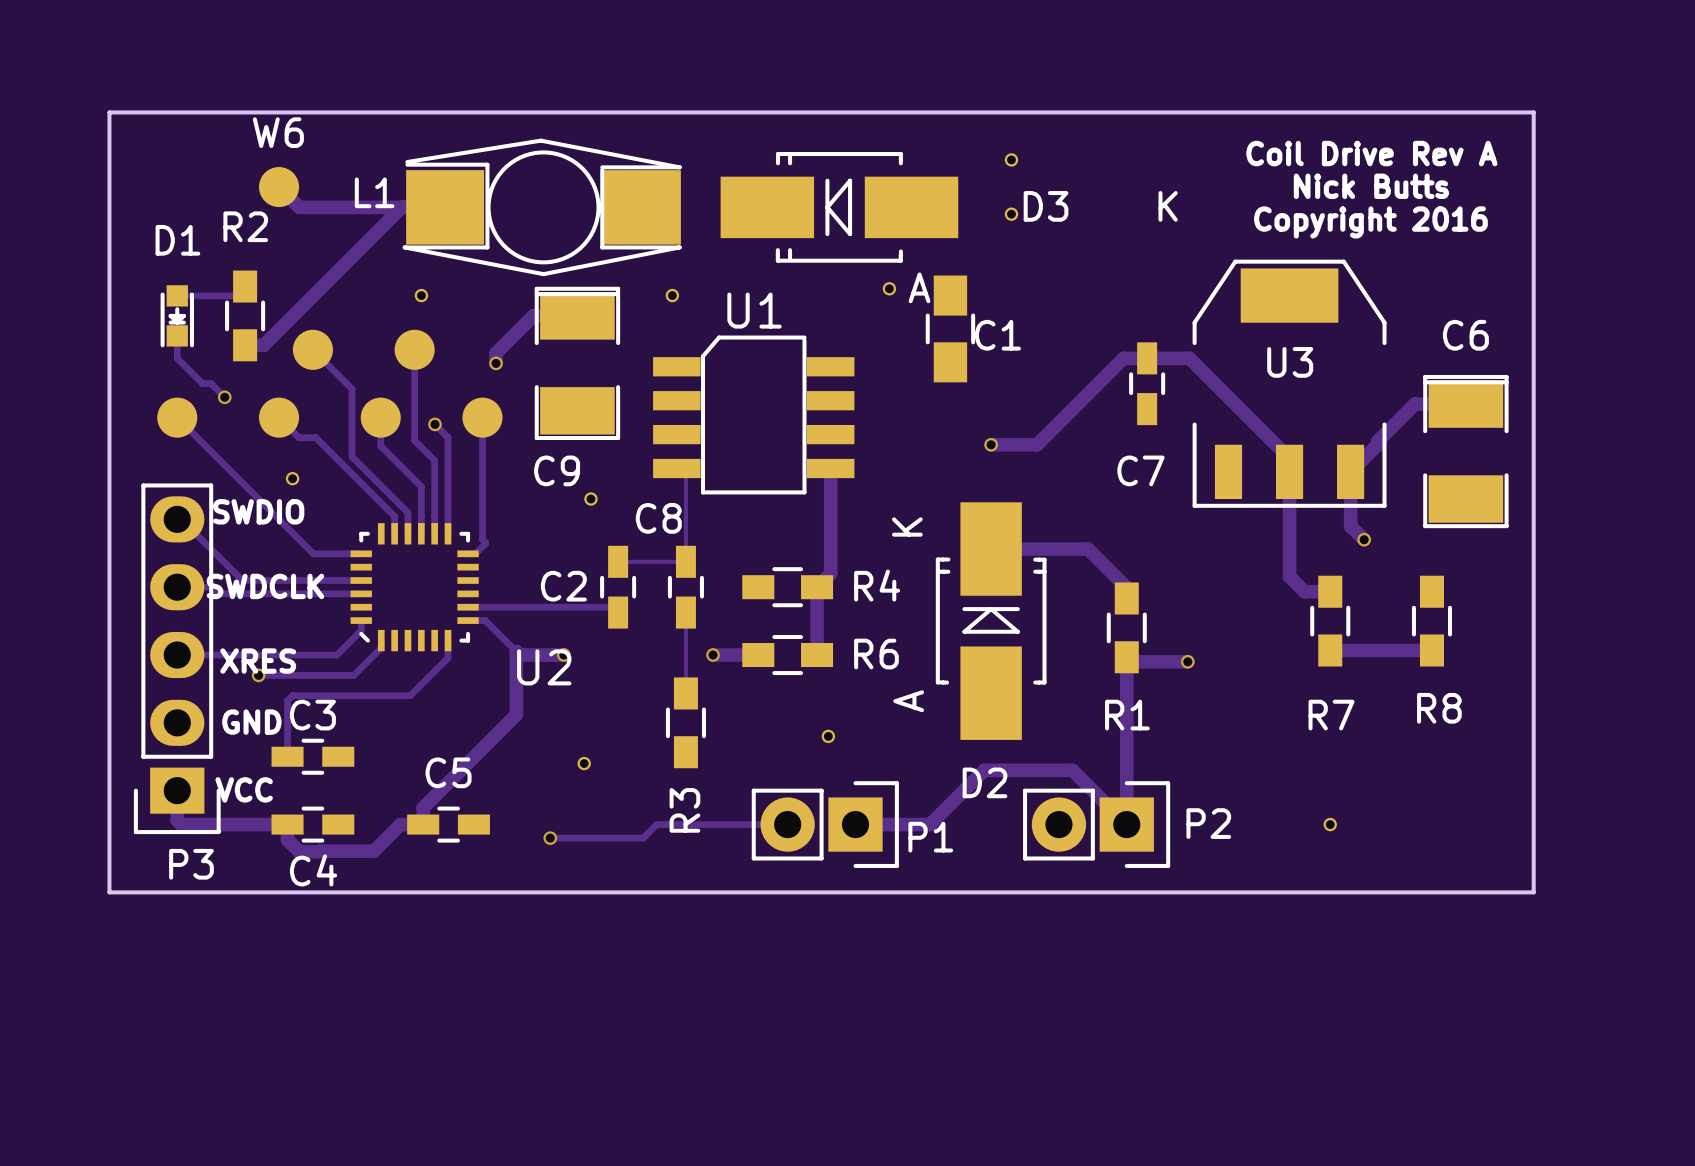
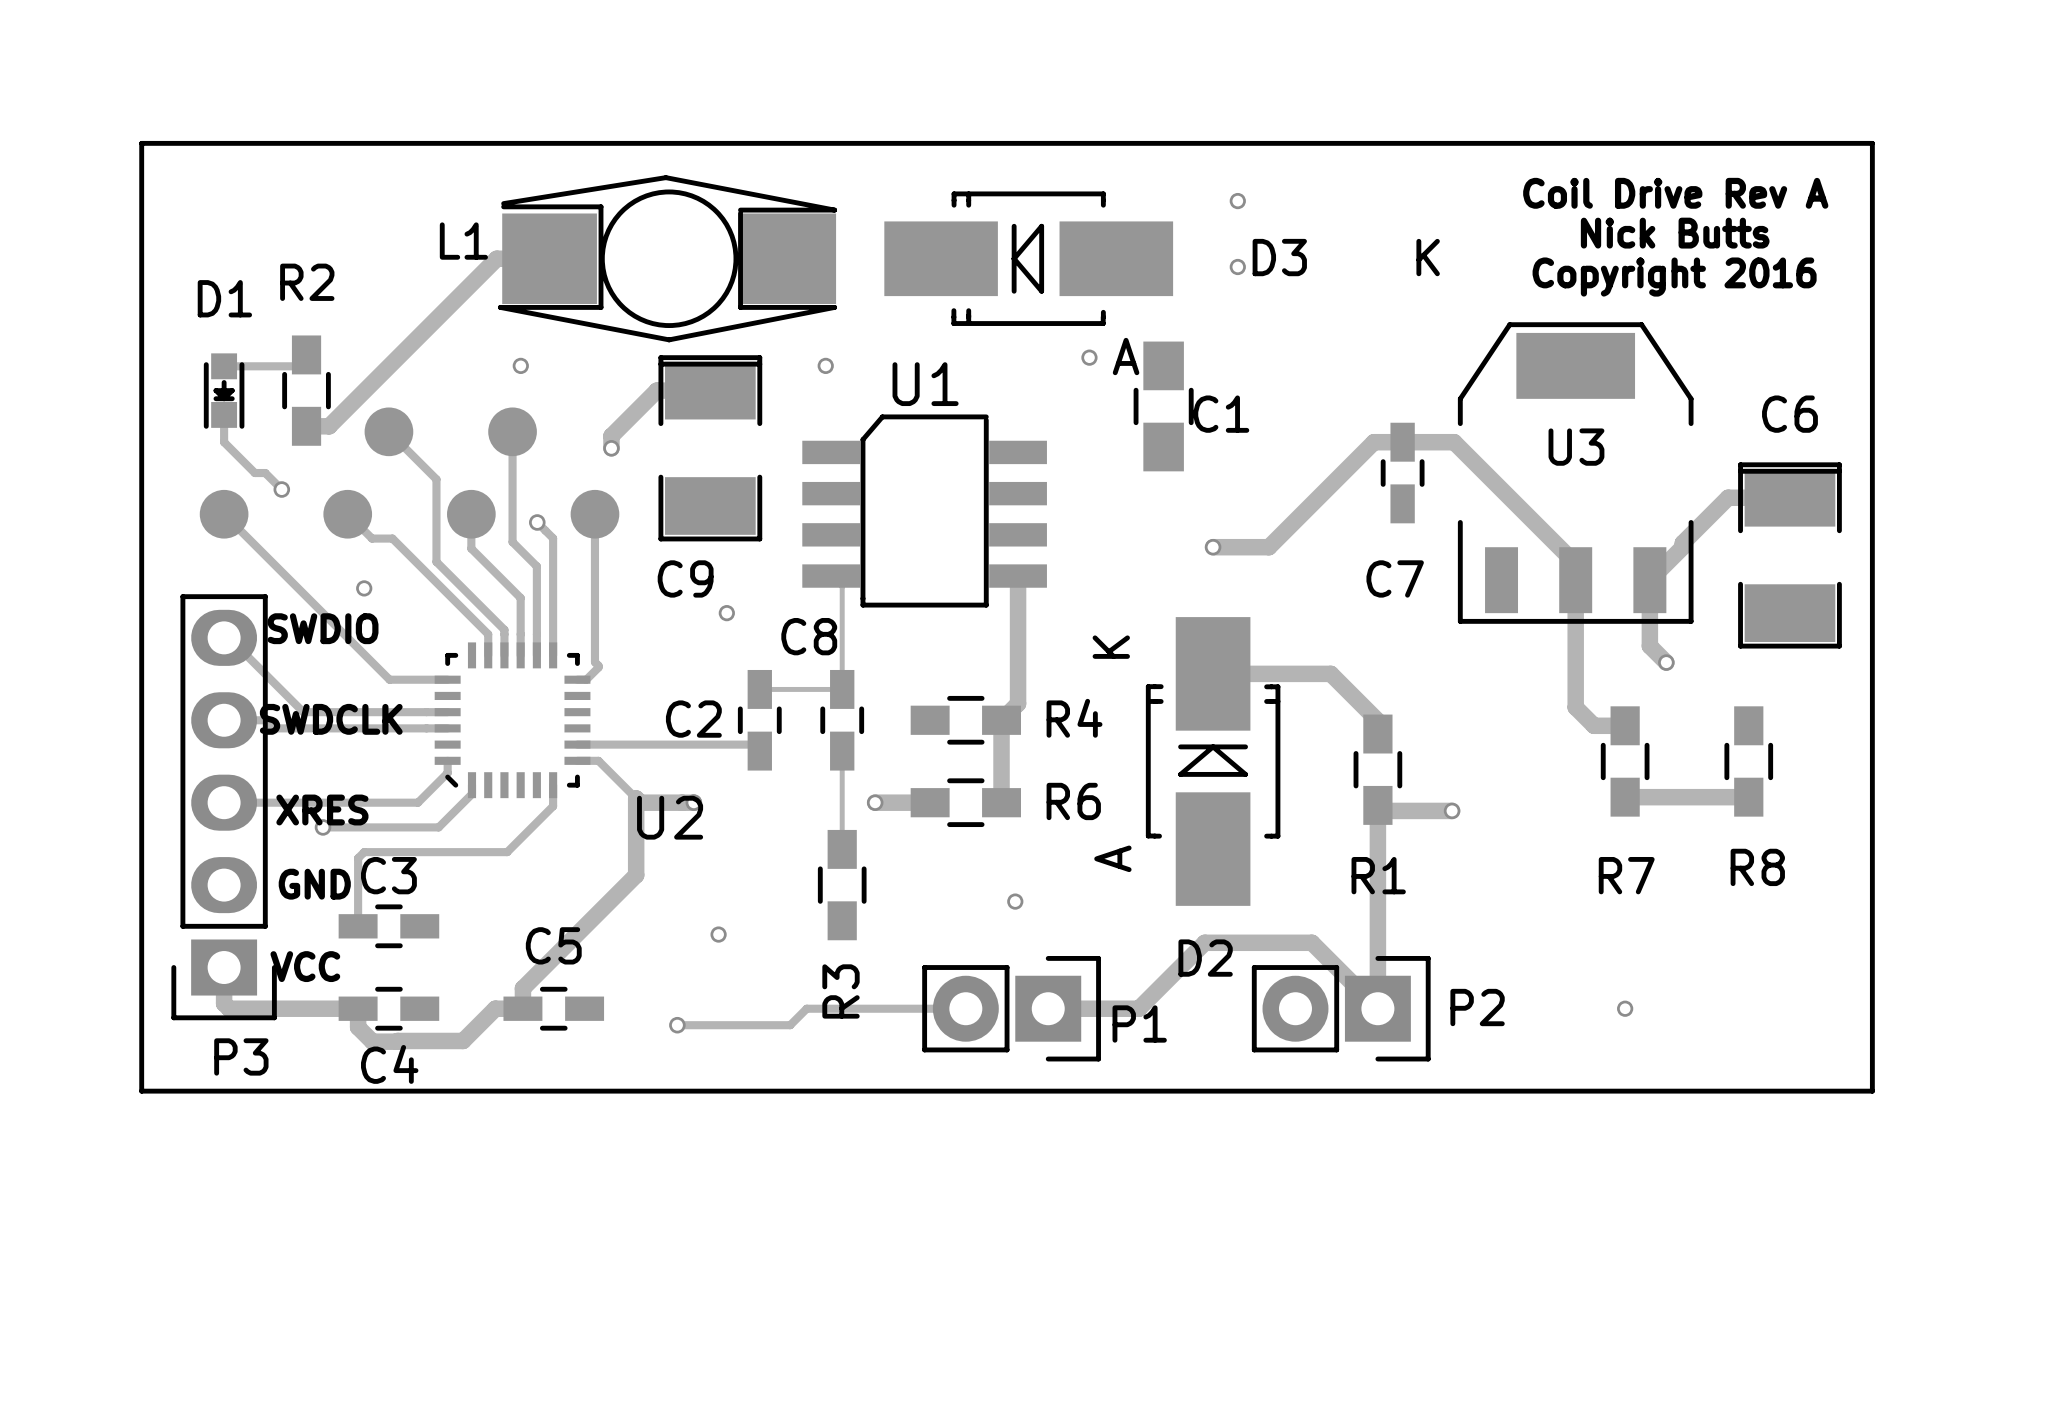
track: (279, 187) (299, 207) (401, 207) -> none
W6: (279, 187) -> none

